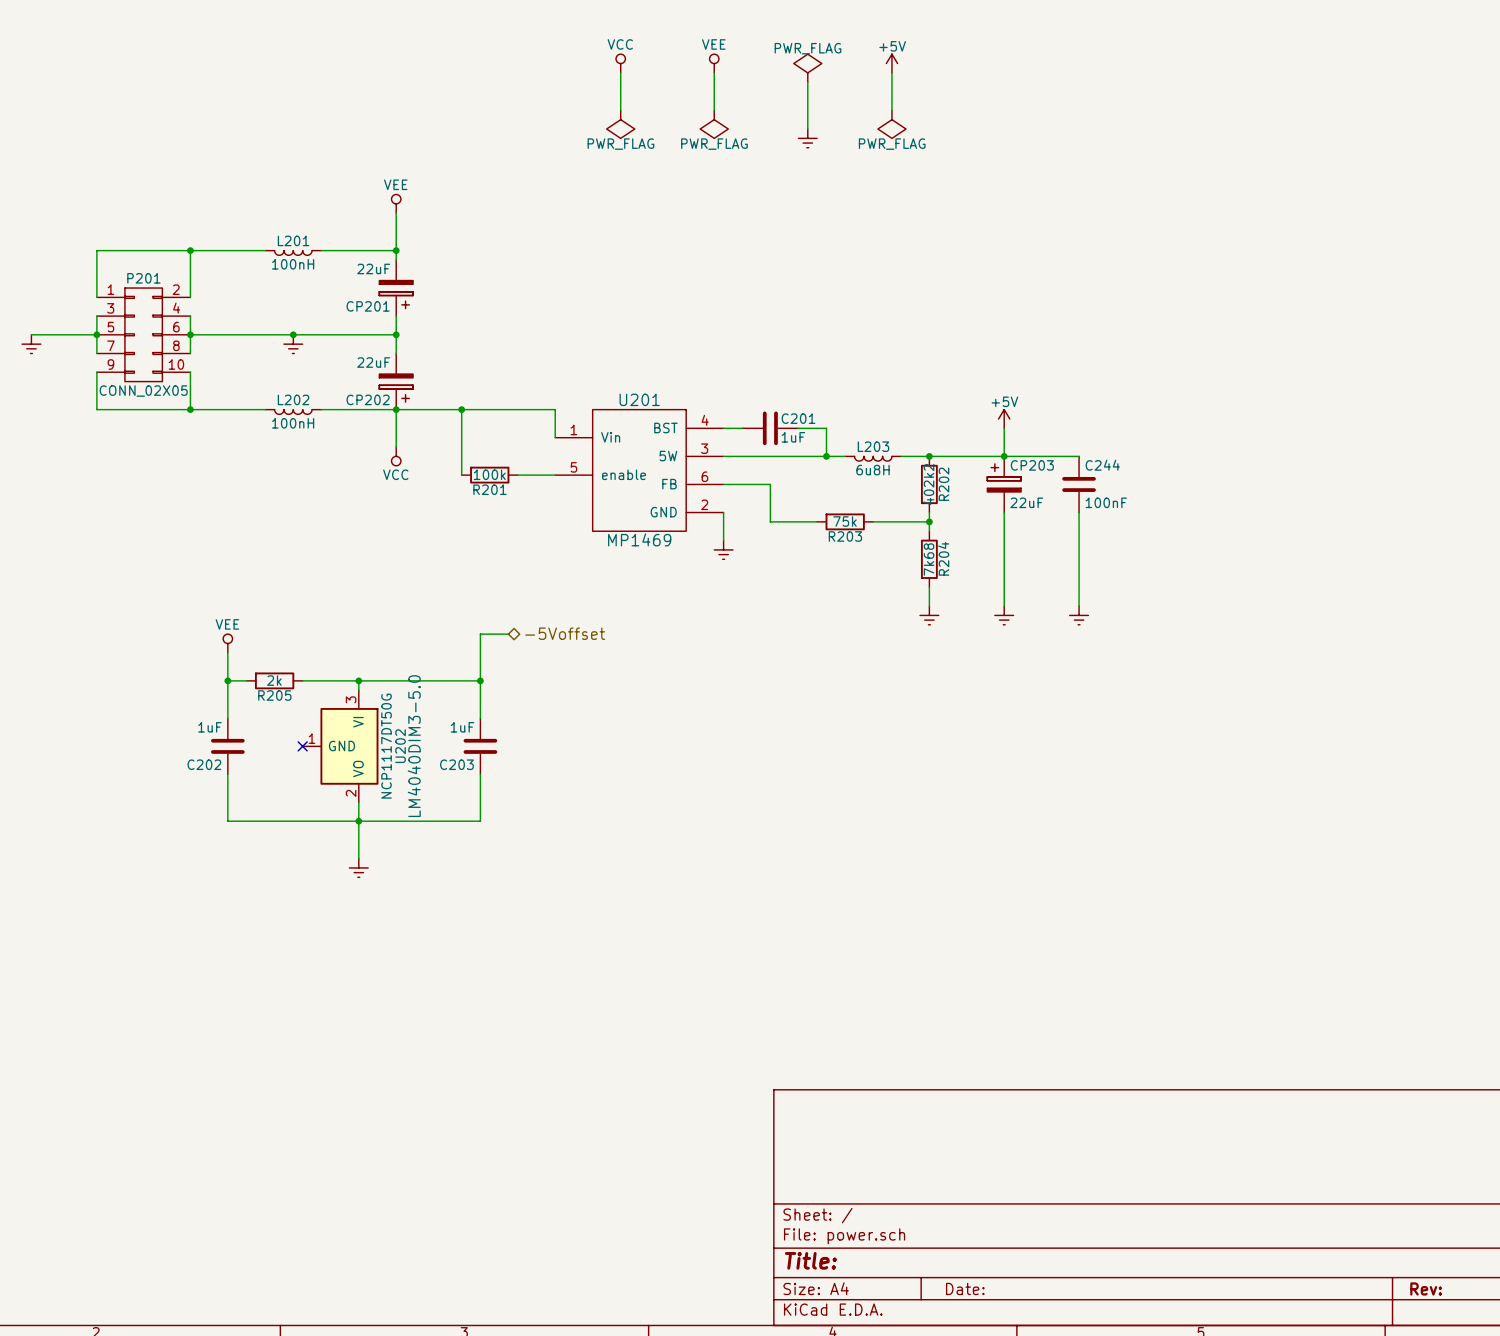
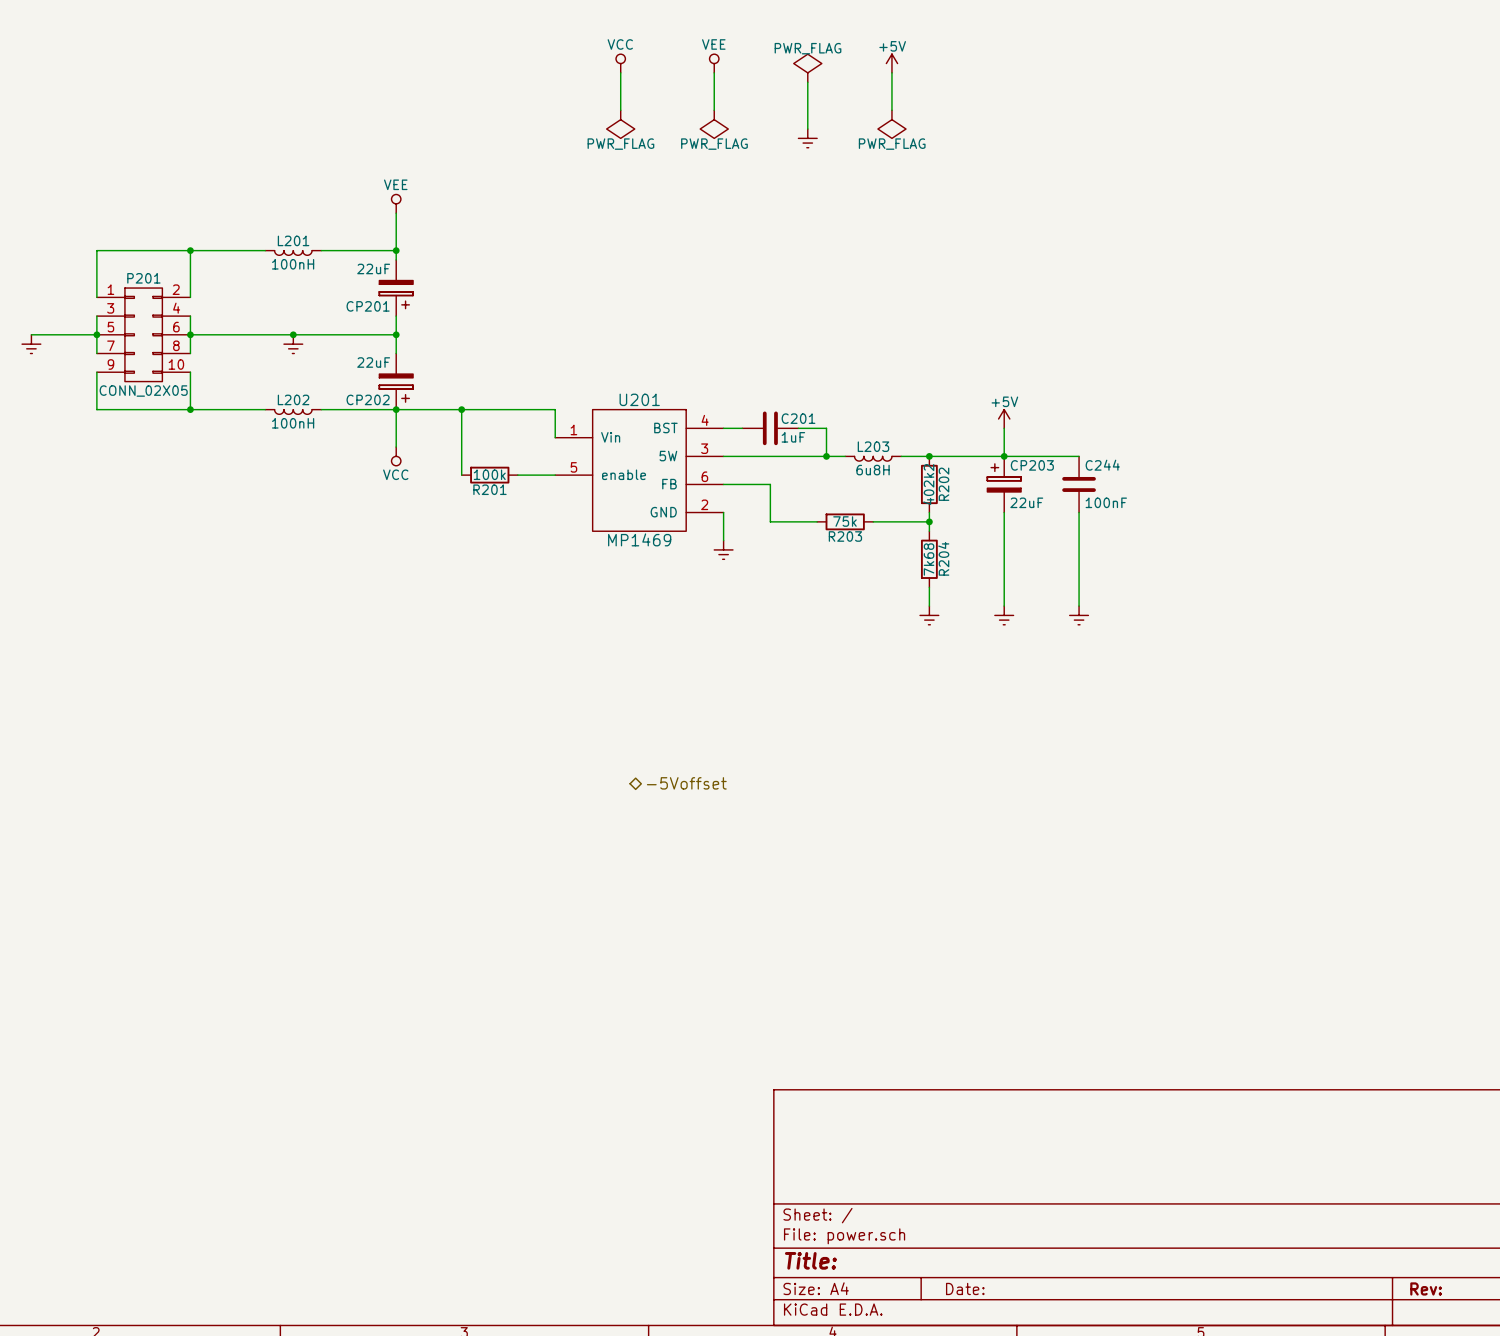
hierarchical label: -5Voffset (565, 633) -> none
wire: (508, 634) (480, 634) (480, 718) -> none
power symbol: VEE (227, 643) -> none
wire: (227, 652) (227, 718) -> none
wire: (227, 680) (246, 680) -> none
junction: (227, 680) -> none
R205: 2k (274, 680) -> none
wire: (302, 680) (480, 680) -> none
wire: (358, 680) (358, 690) -> none
junction: (358, 680) -> none
junction: (480, 680) -> none
C202: 1uF (227, 746) -> none
no-connect mark: (302, 746) -> none
U202: NCP1117DT50G (340, 746) -> none
C203: 1uF (480, 746) -> none
wire: (227, 774) (227, 821) (480, 821) (480, 774) -> none
hierarchical label: none -> -5Voffset (686, 783)
wire: (358, 802) (358, 858) -> none
junction: (358, 821) -> none
power symbol: (358, 867) -> none

